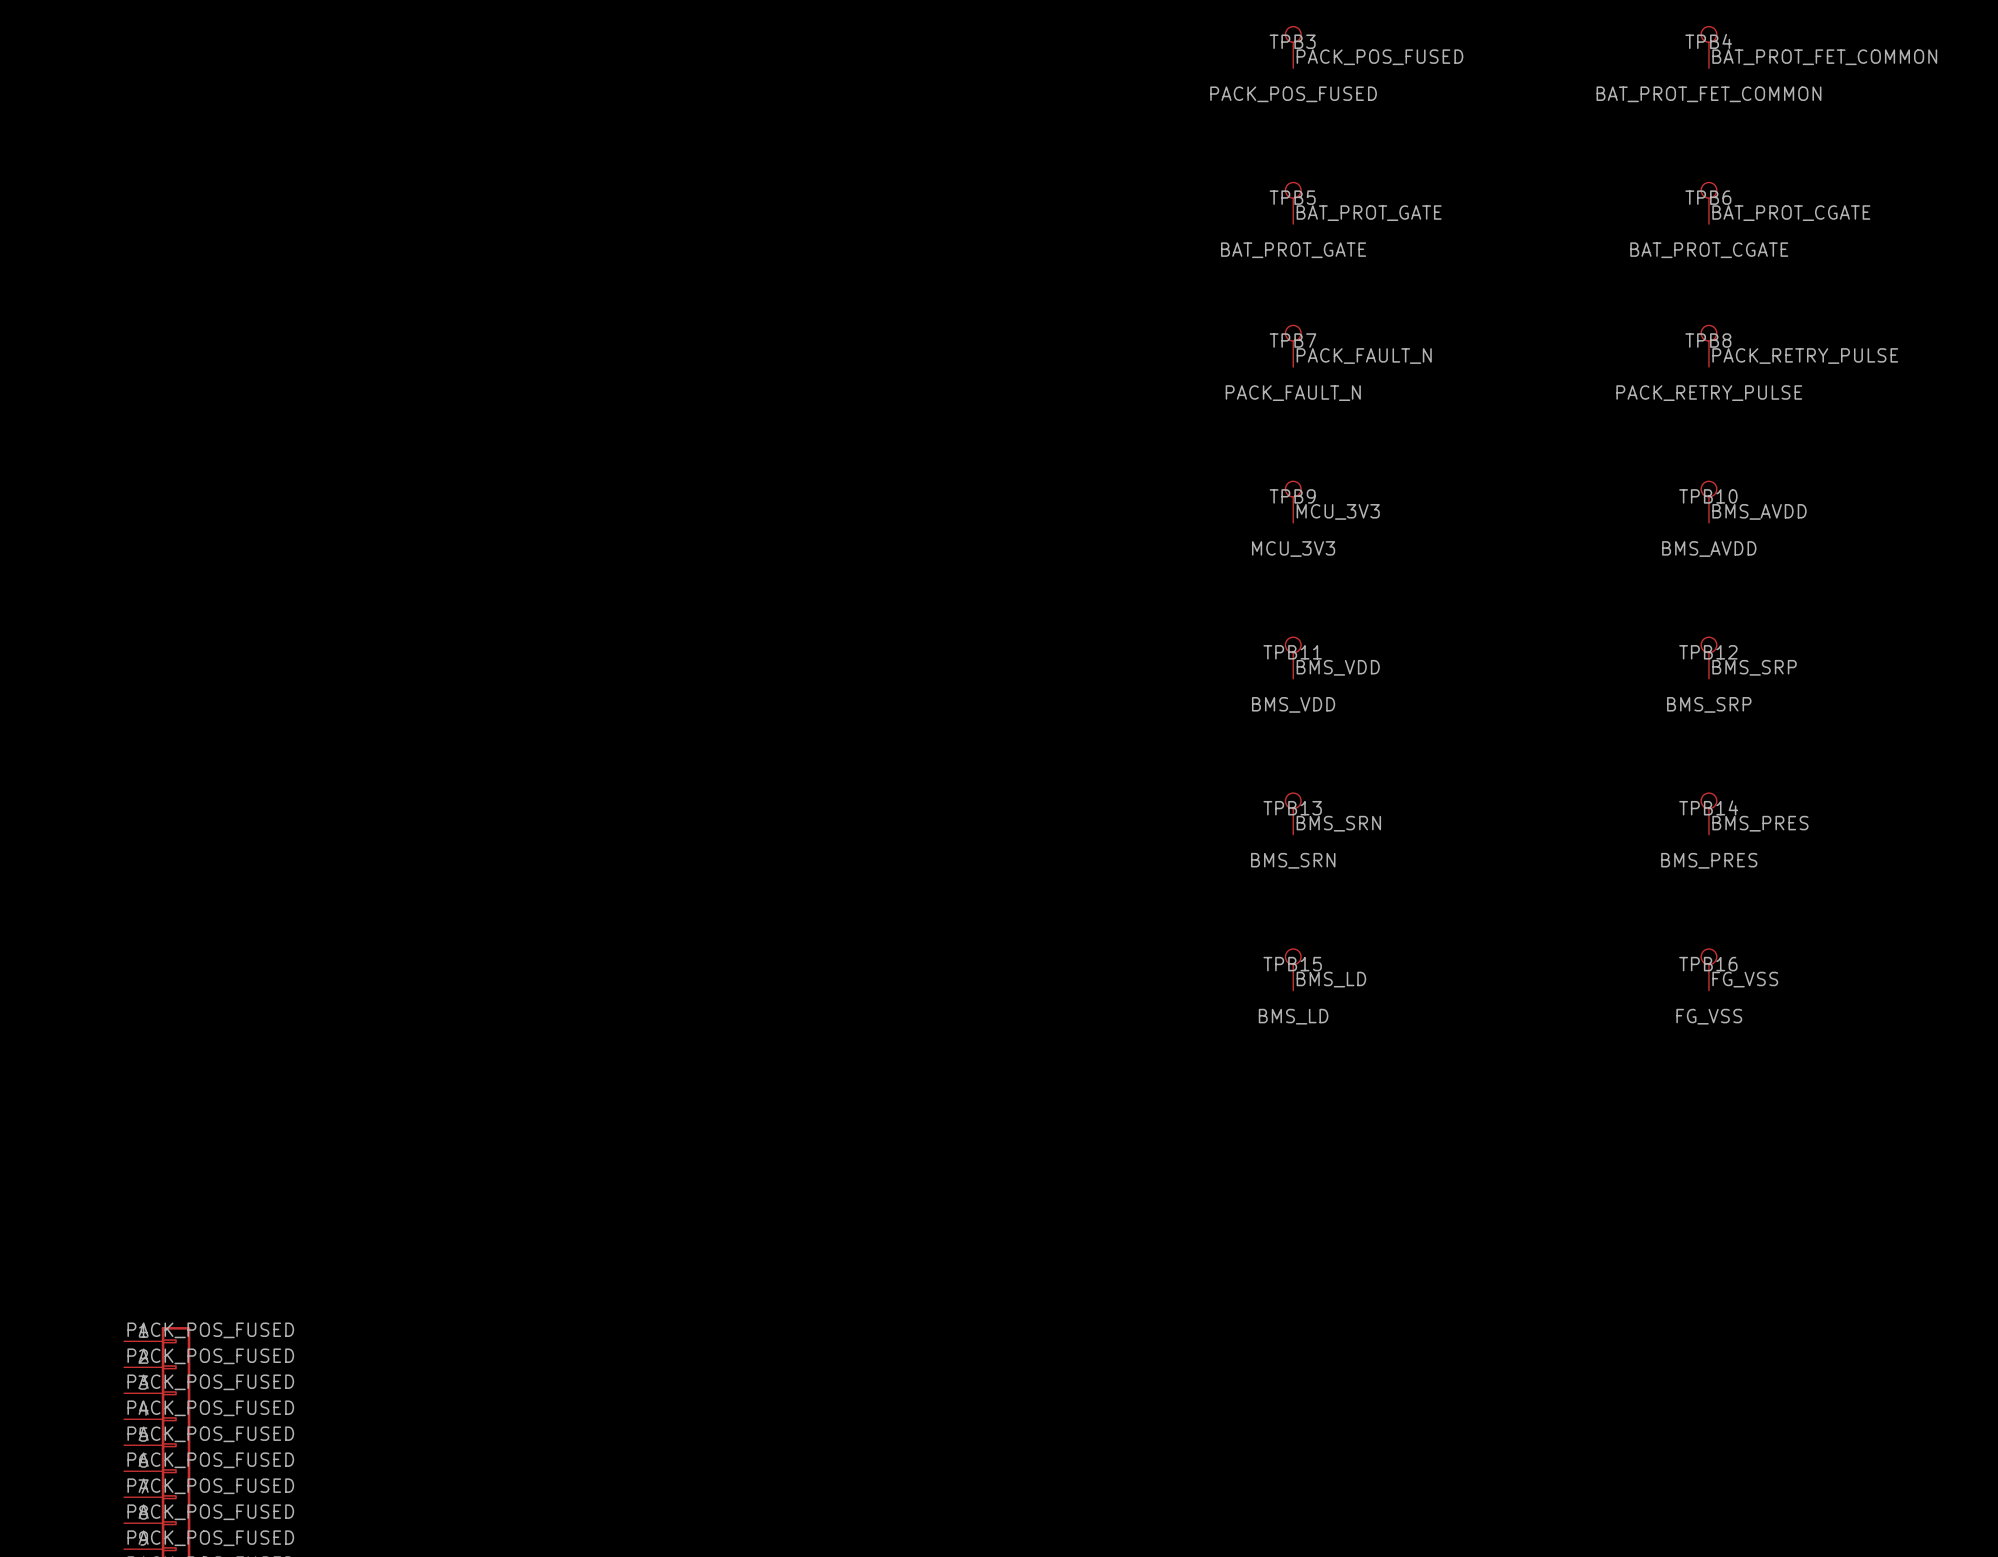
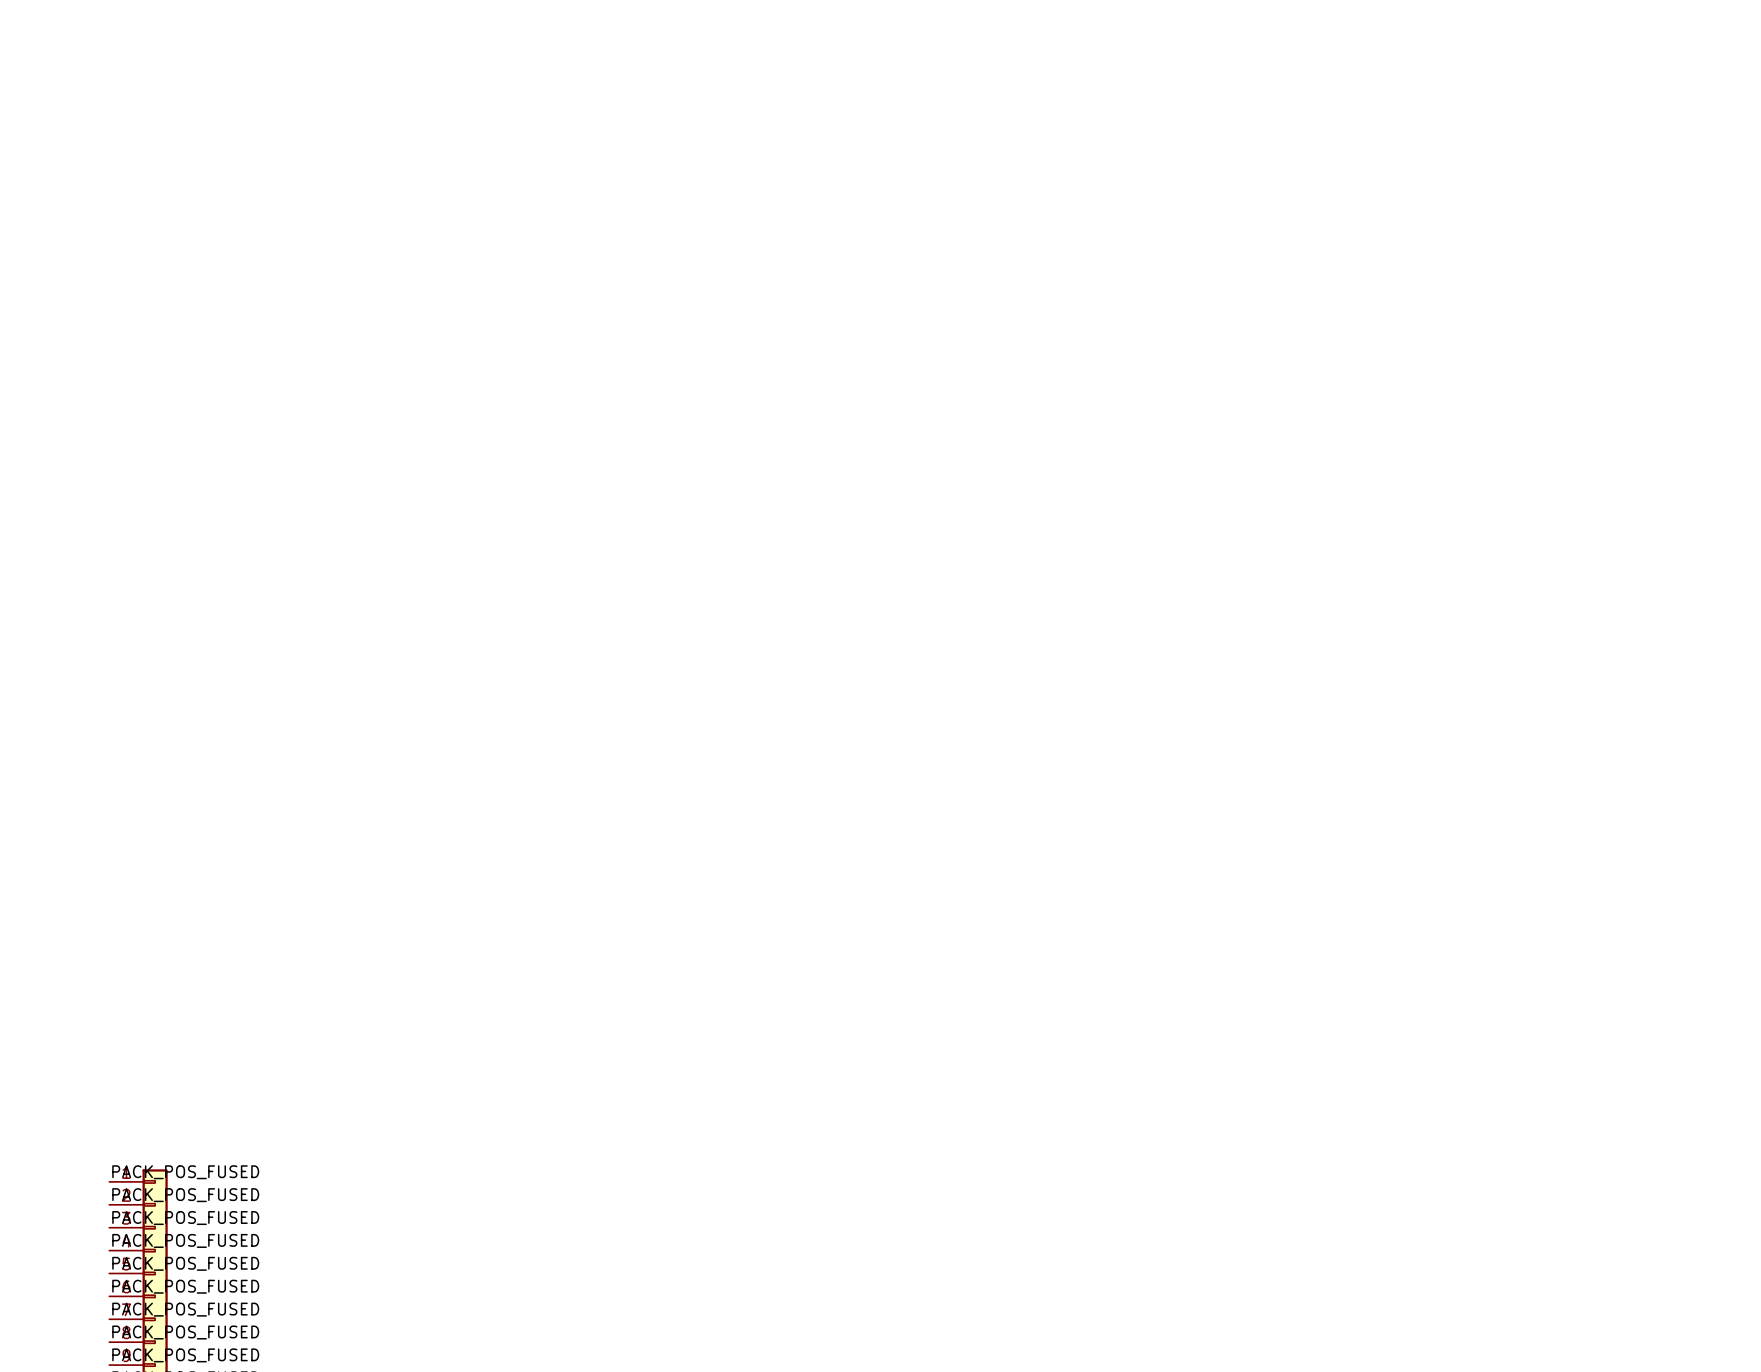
TPB3: PACK_POS_FUSED (1293, 47) -> none
TPB4: BAT_PROT_FET_COMMON (1708, 47) -> none
label: PACK_POS_FUSED (1379, 57) -> none
label: BAT_PROT_FET_COMMON (1824, 57) -> none
TPB5: BAT_PROT_GATE (1293, 203) -> none
TPB6: BAT_PROT_CGATE (1708, 203) -> none
label: BAT_PROT_GATE (1369, 213) -> none
label: BAT_PROT_CGATE (1791, 213) -> none
TPB7: PACK_FAULT_N (1293, 346) -> none
TPB8: PACK_RETRY_PULSE (1708, 346) -> none
label: PACK_FAULT_N (1364, 356) -> none
label: PACK_RETRY_PULSE (1805, 356) -> none
TPB9: MCU_3V3 (1293, 502) -> none
TPB10: BMS_AVDD (1708, 502) -> none
label: MCU_3V3 (1338, 511) -> none
label: BMS_AVDD (1759, 511) -> none
TPB11: BMS_VDD (1293, 658) -> none
TPB12: BMS_SRP (1708, 658) -> none
label: BMS_VDD (1338, 667) -> none
label: BMS_SRP (1754, 667) -> none
TPB13: BMS_SRN (1293, 813) -> none
TPB14: BMS_PRES (1708, 813) -> none
label: BMS_SRN (1338, 823) -> none
label: BMS_PRES (1760, 823) -> none
TPB15: BMS_LD (1293, 969) -> none
TPB16: FG_VSS (1708, 969) -> none
label: BMS_LD (1331, 979) -> none
label: FG_VSS (1745, 979) -> none

